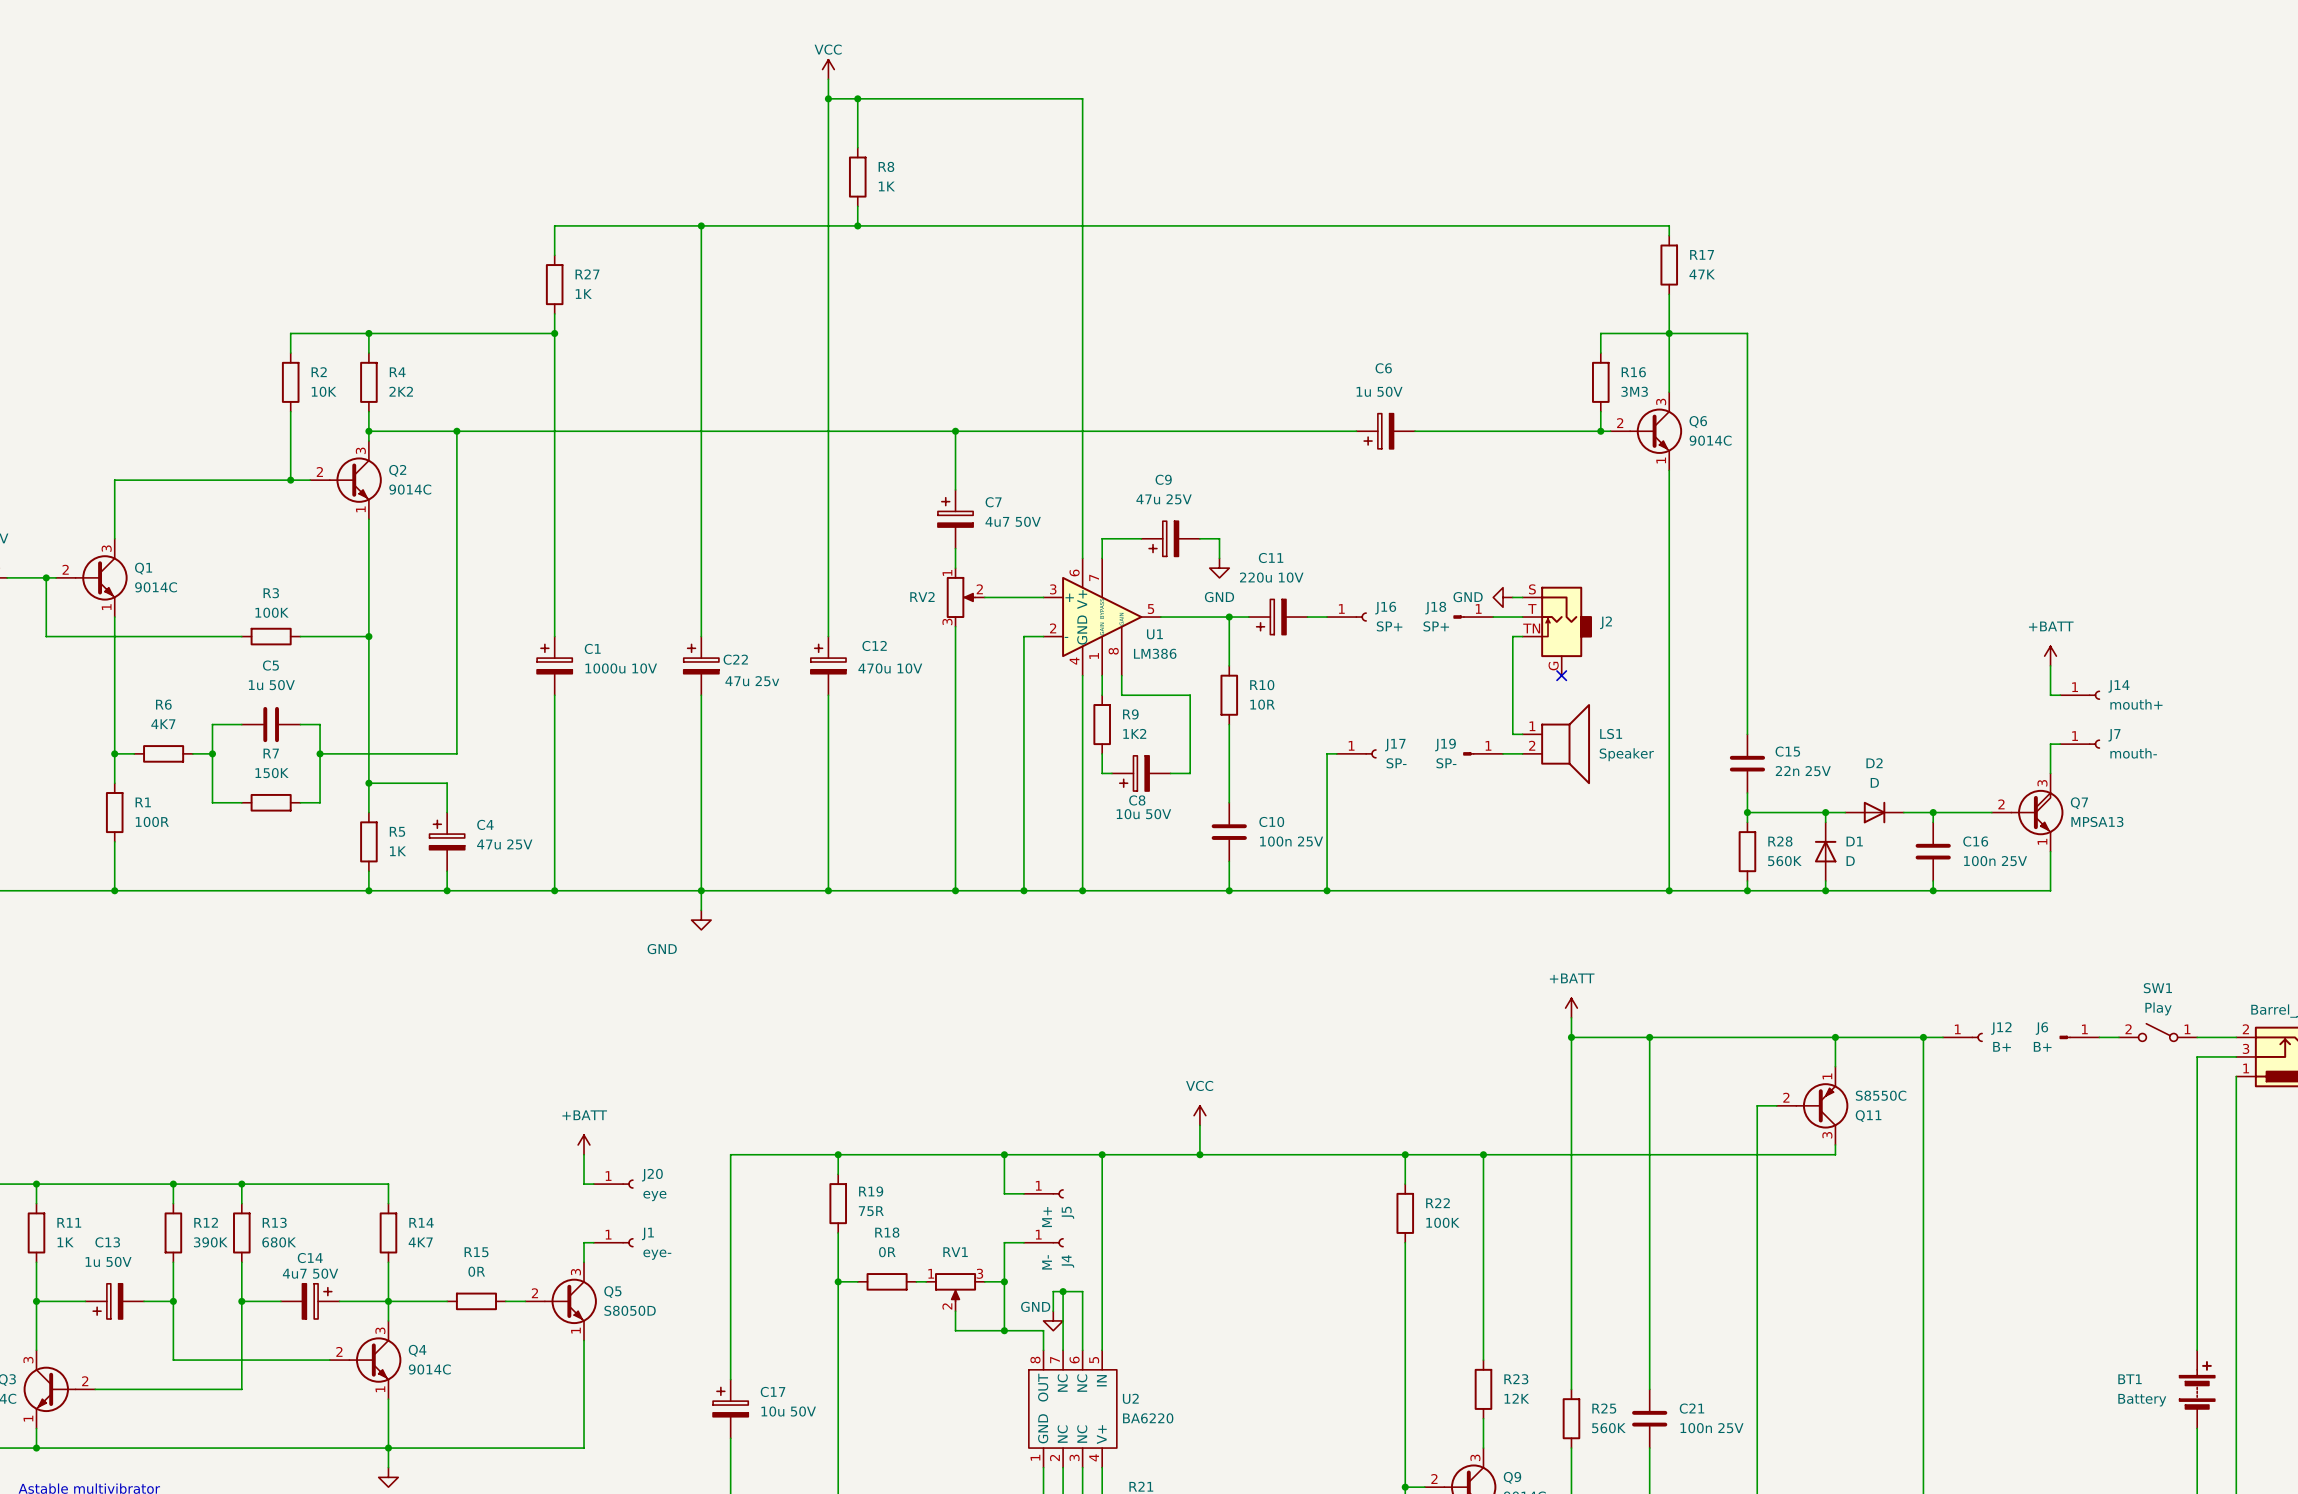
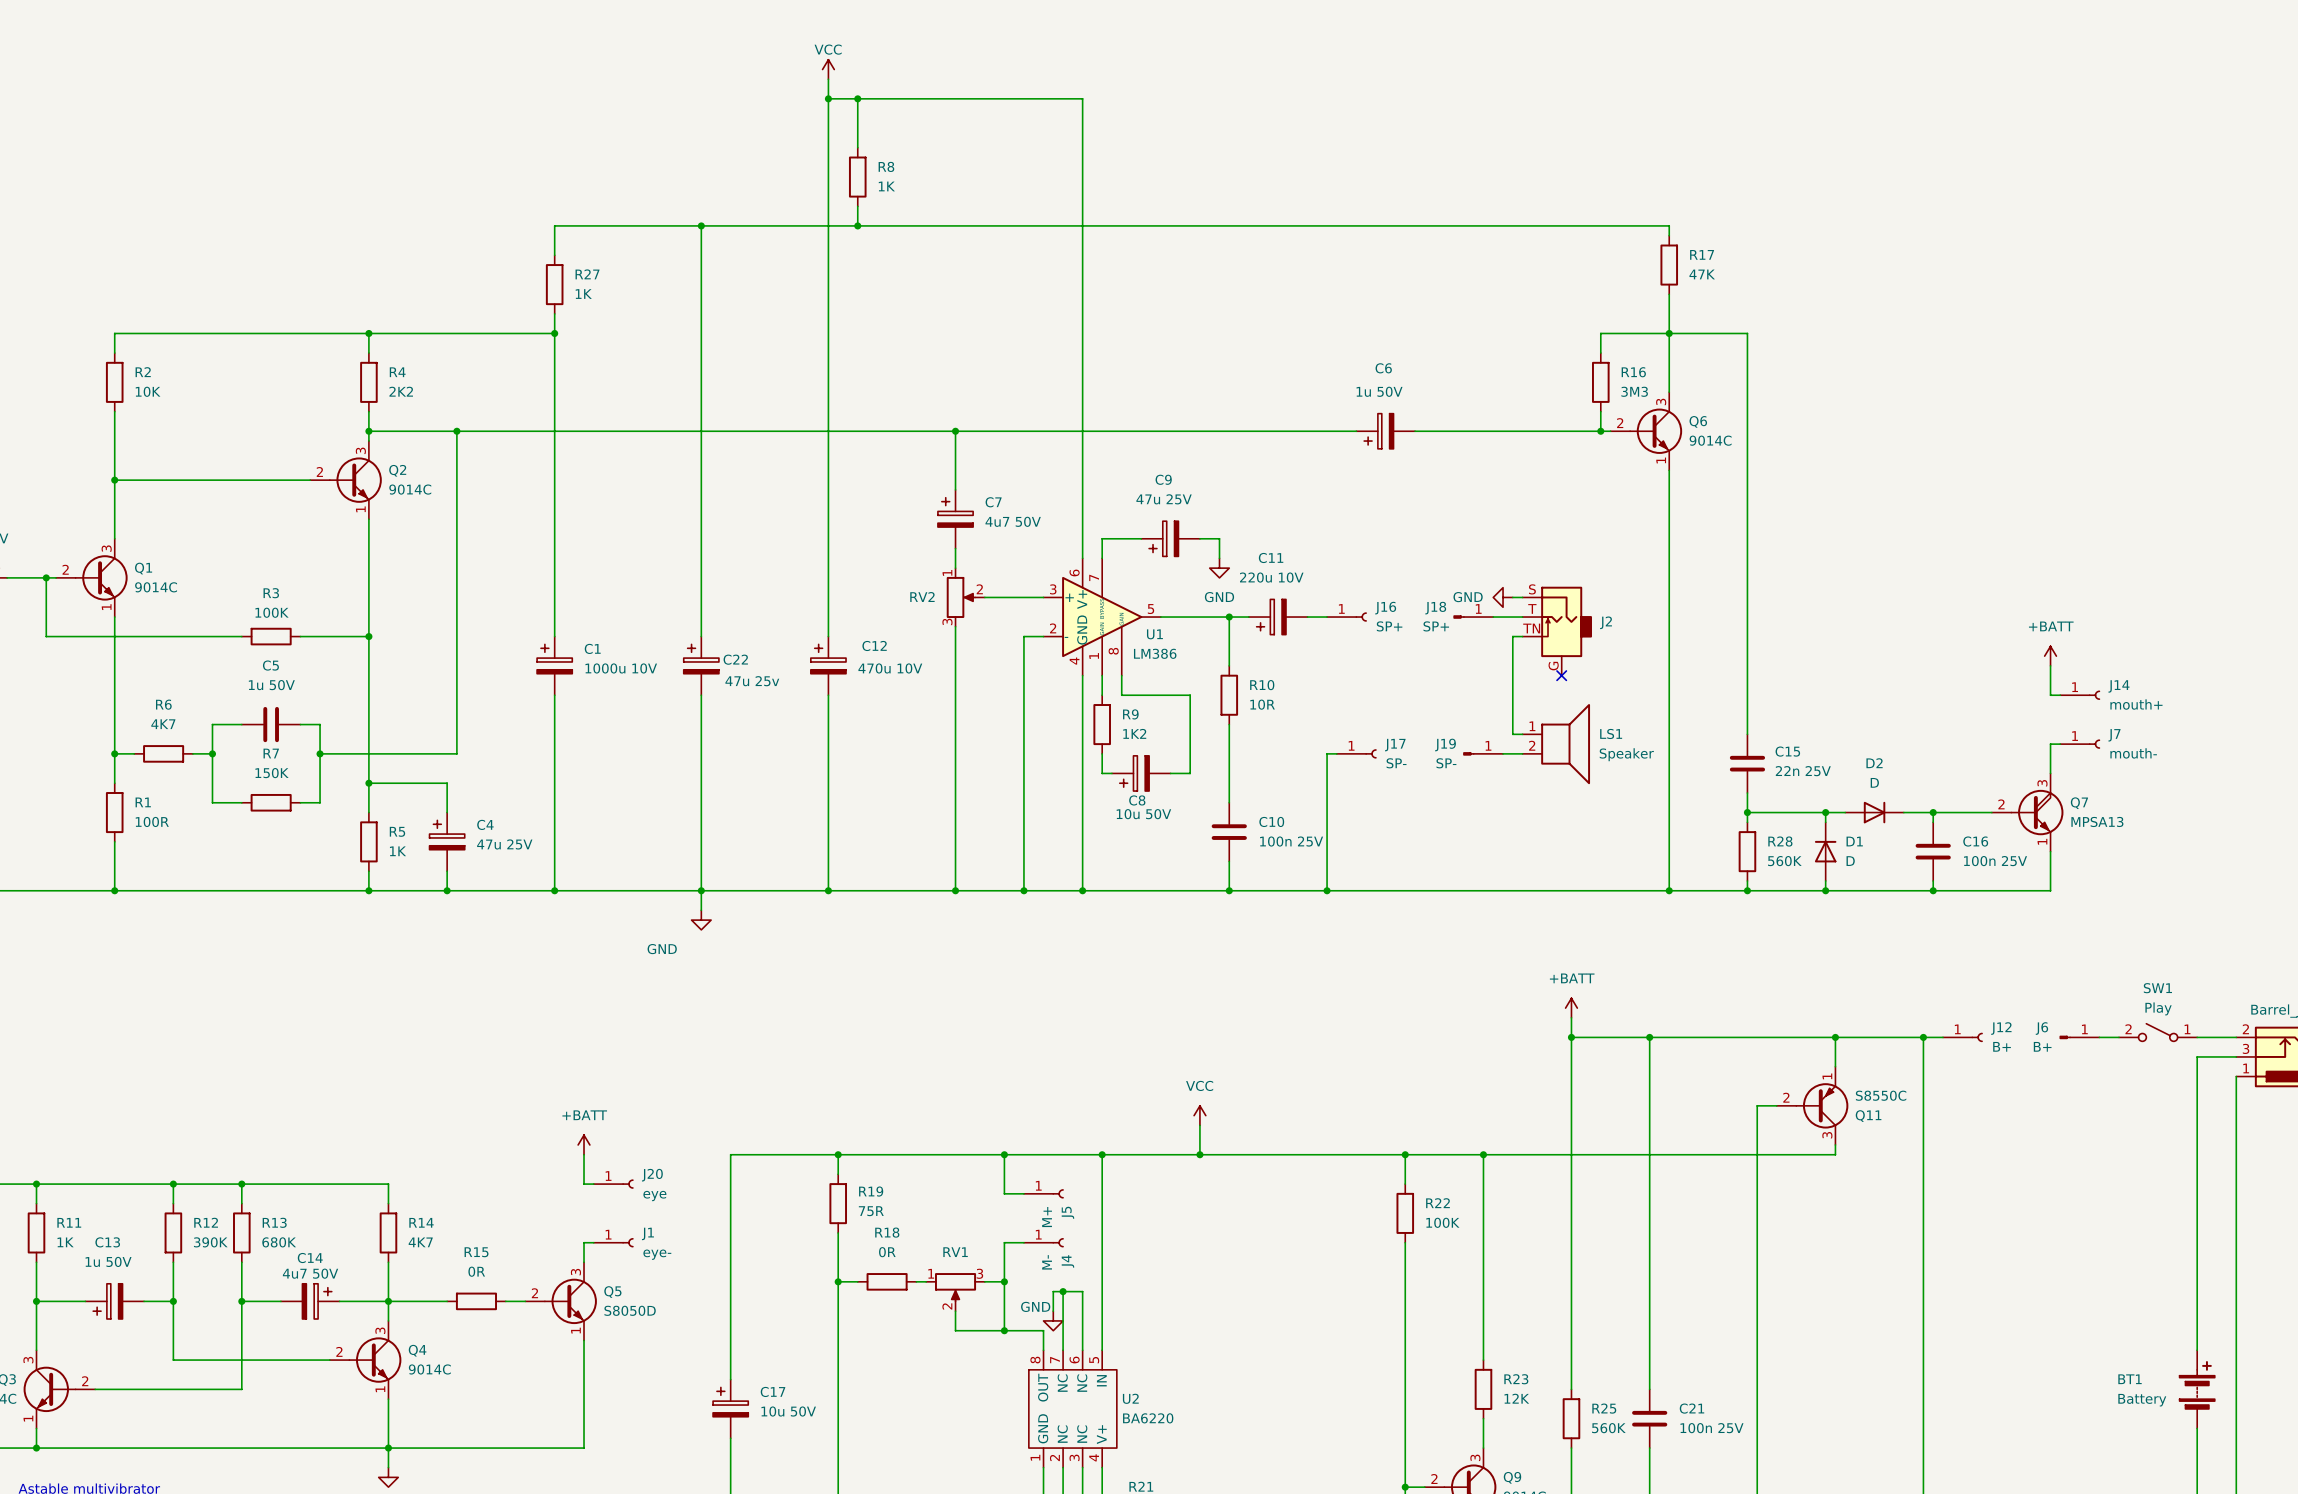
wire: (290, 333) (290, 353) -> (290, 333) (114, 333) (114, 353)
R2 position: (290, 382) -> (114, 382)
wire: (290, 411) (290, 480) -> (114, 411) (114, 480)
junction: none -> (114, 480)
junction: (290, 480) -> none

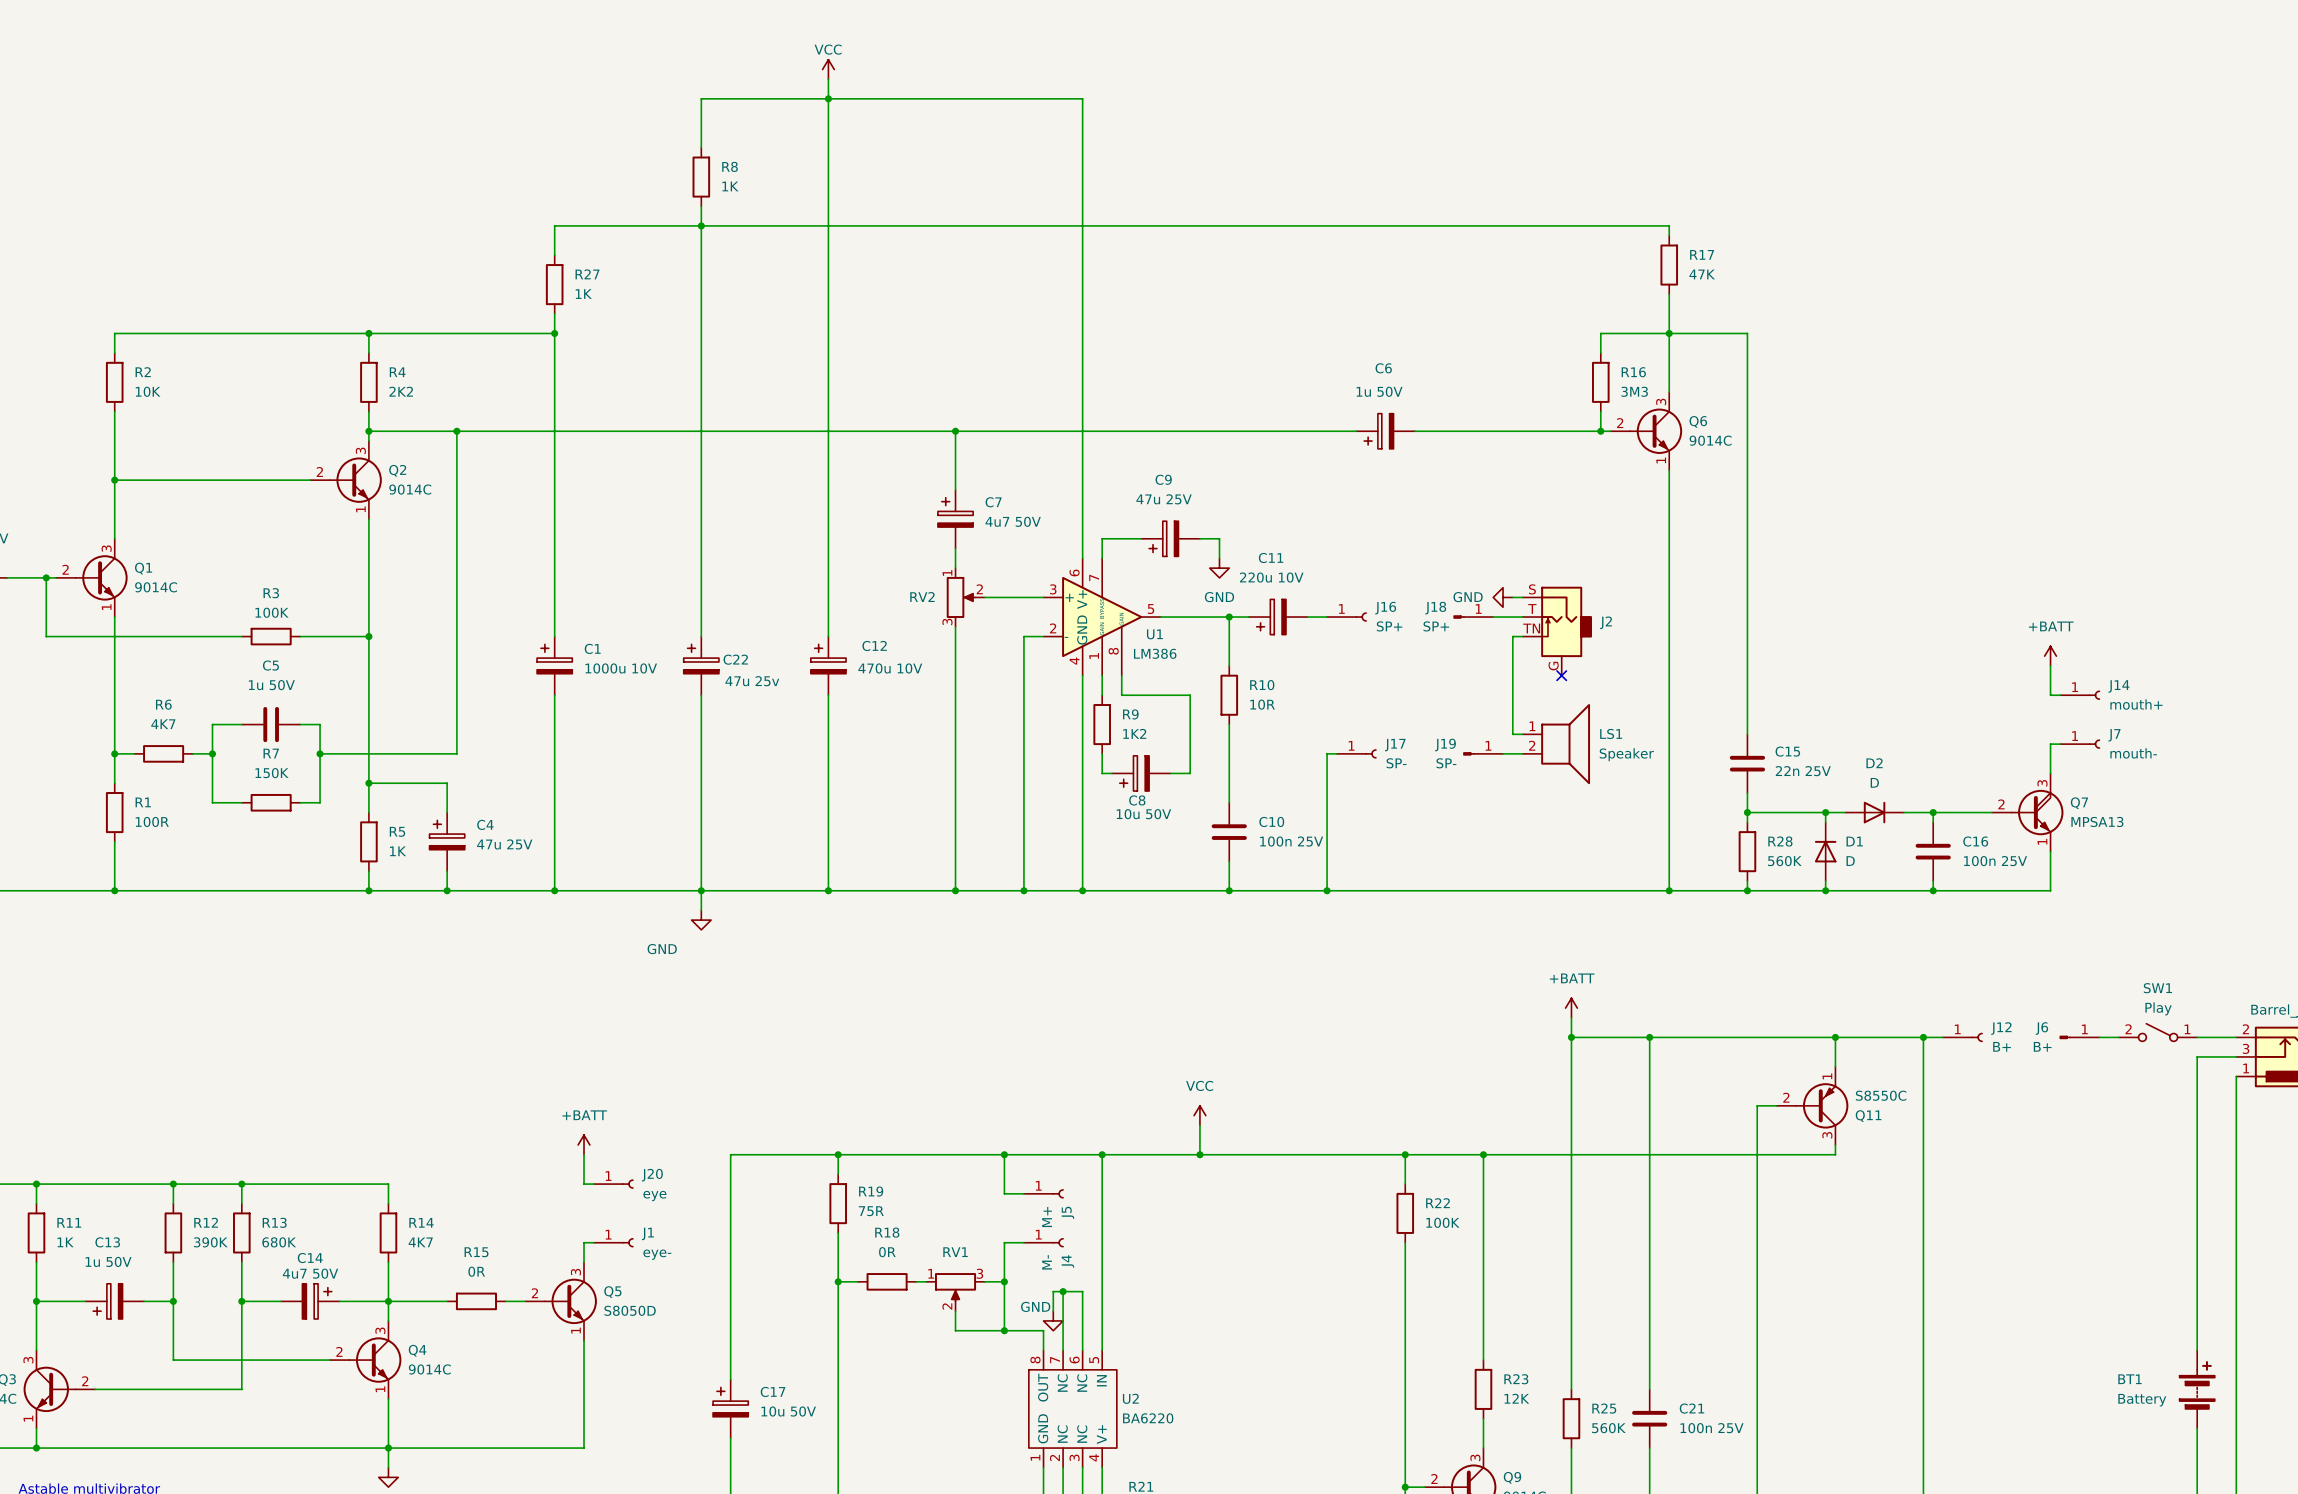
wire: none -> (828, 98) (701, 98) (701, 147)
wire: (857, 98) (857, 147) -> none
junction: (857, 98) -> none
R8 position: (857, 177) -> (701, 177)
wire: (857, 206) (857, 225) -> (701, 206) (701, 225)
junction: (857, 225) -> none

